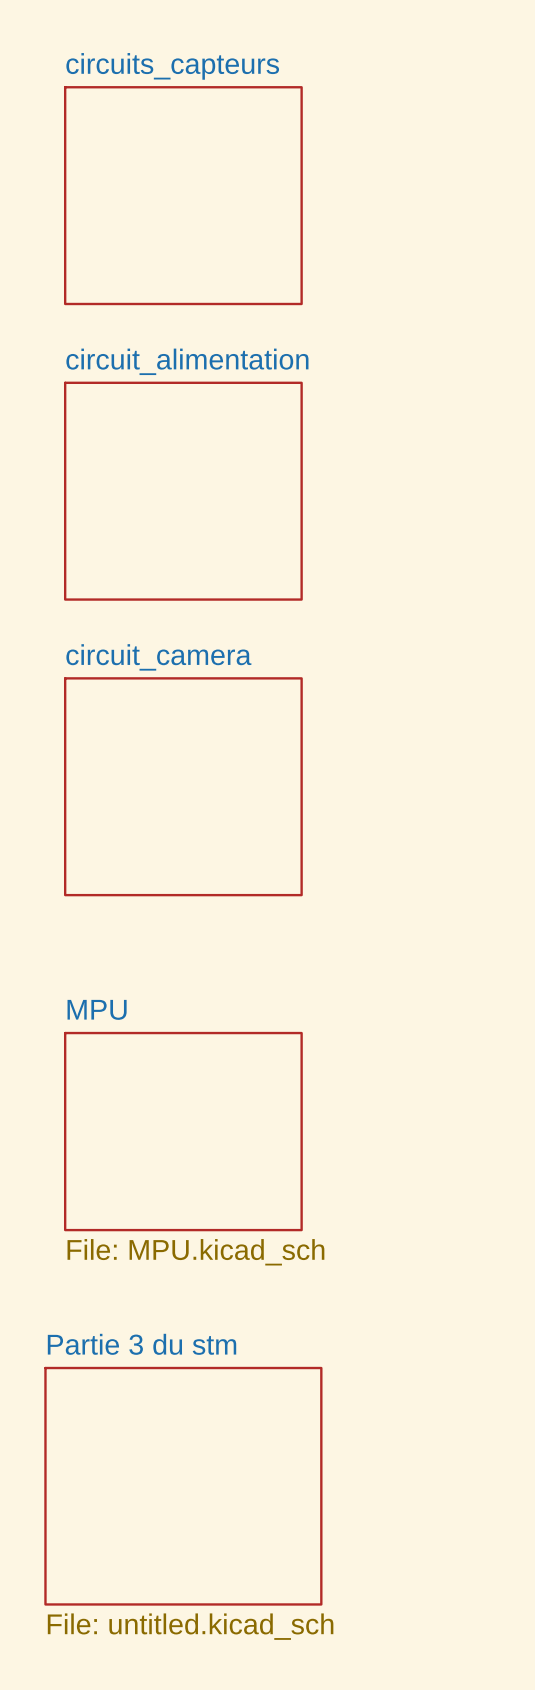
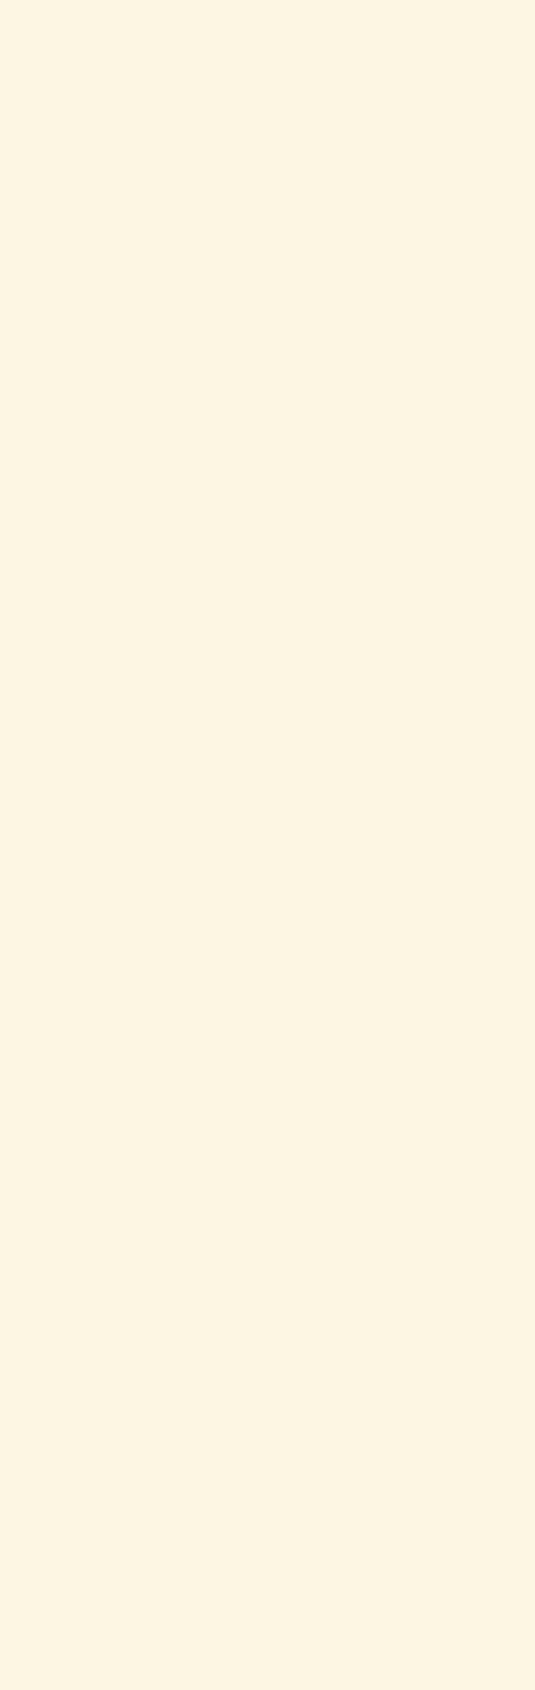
sheet circuits_capteurs: (183, 195) -> none
sheet circuit_alimentation: (183, 491) -> none
sheet circuit_camera: (183, 786) -> none
sheet MPU: File: MPU.kicad_sch (183, 1131) -> none
sheet Partie 3 du stm: File: untitled.kicad_sch (183, 1486) -> none

